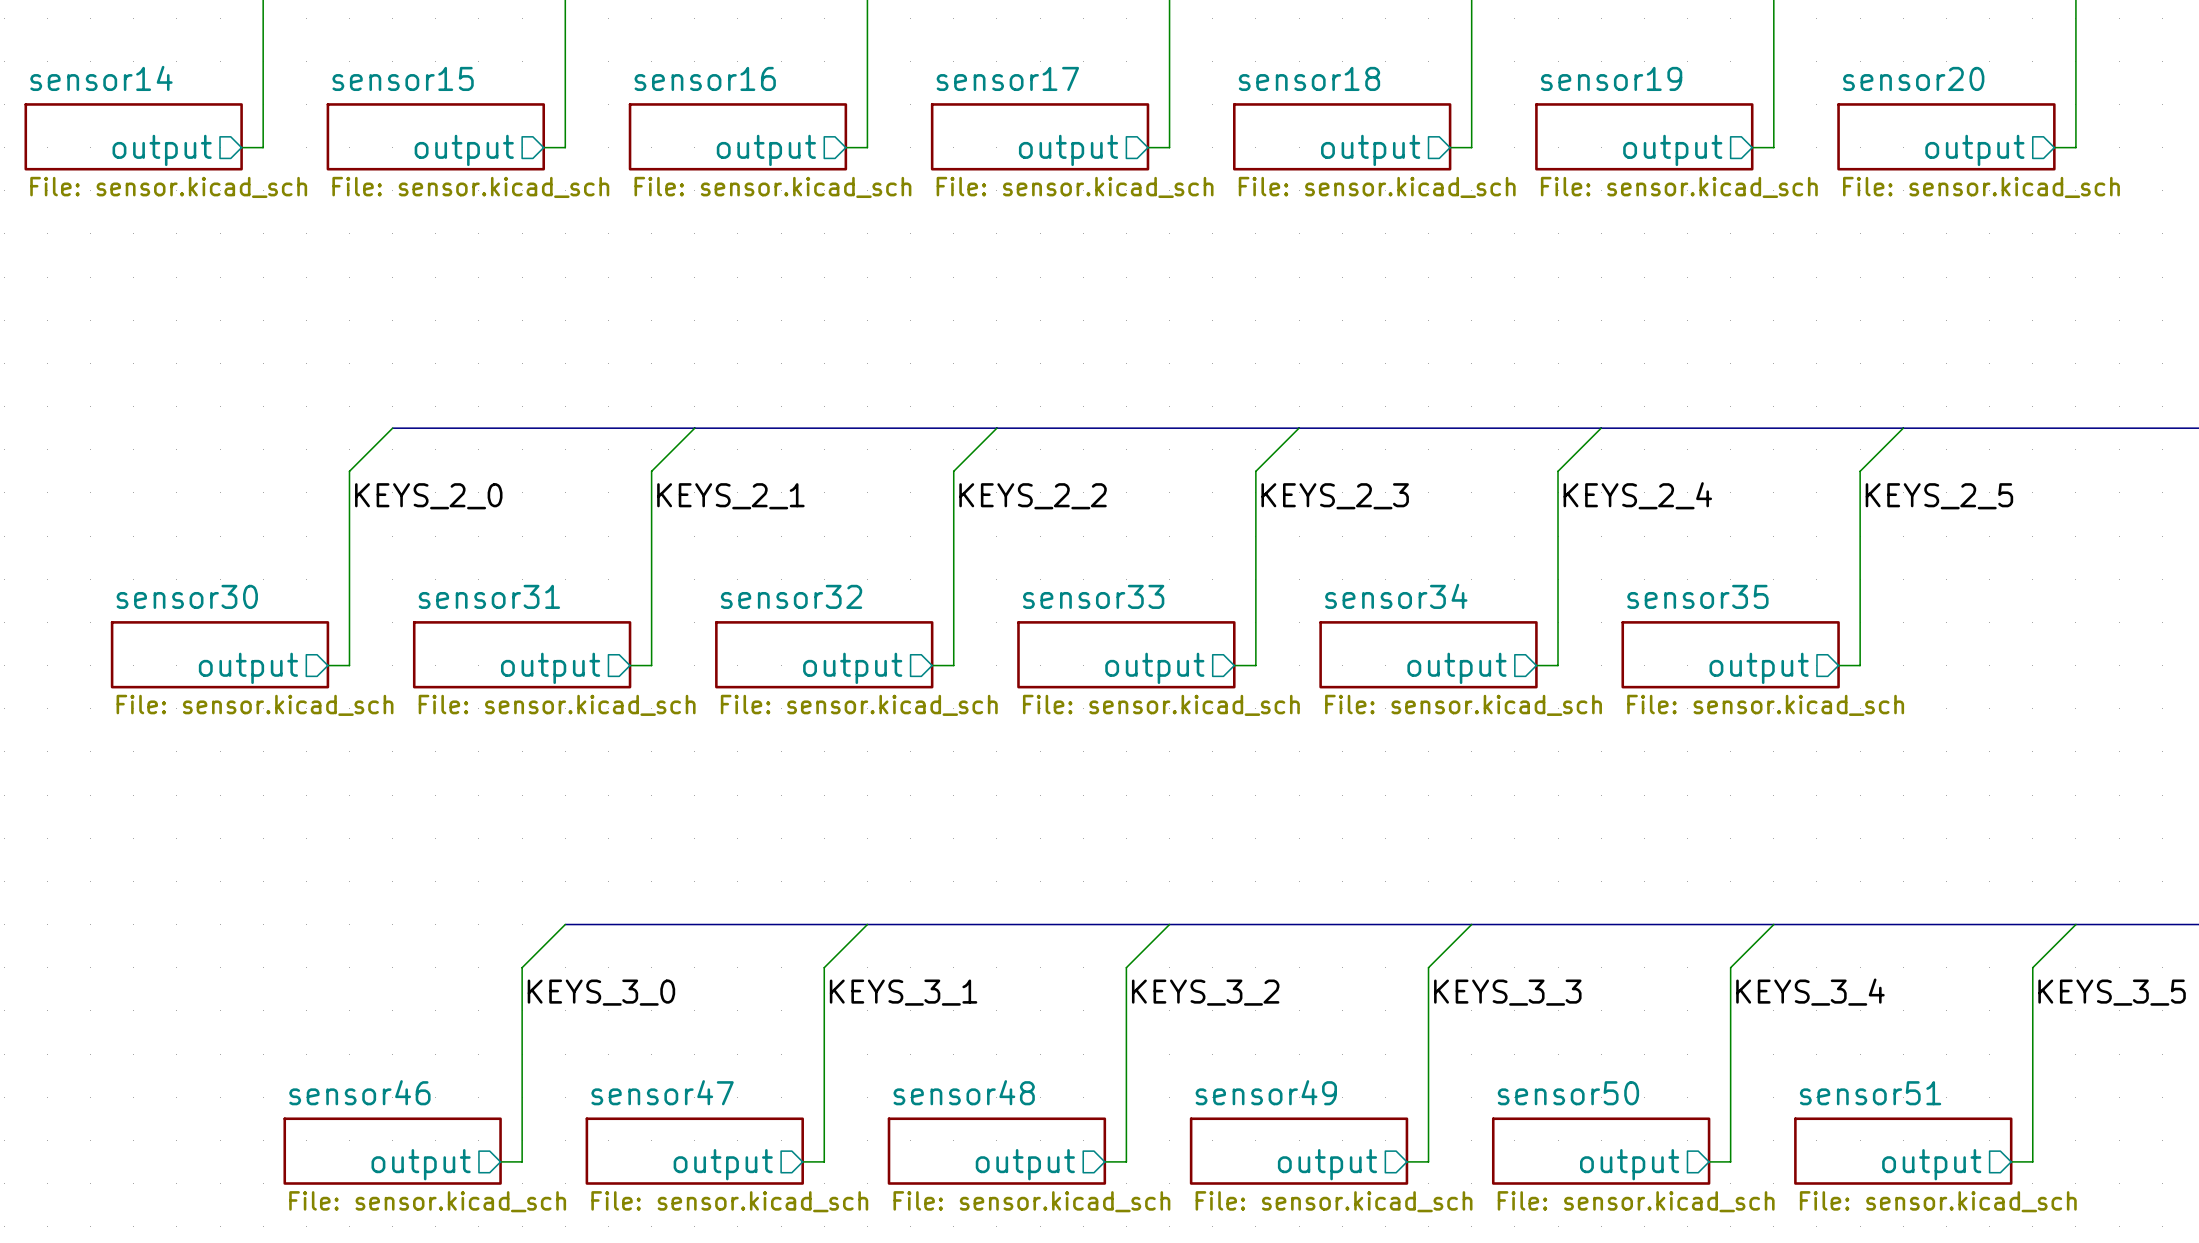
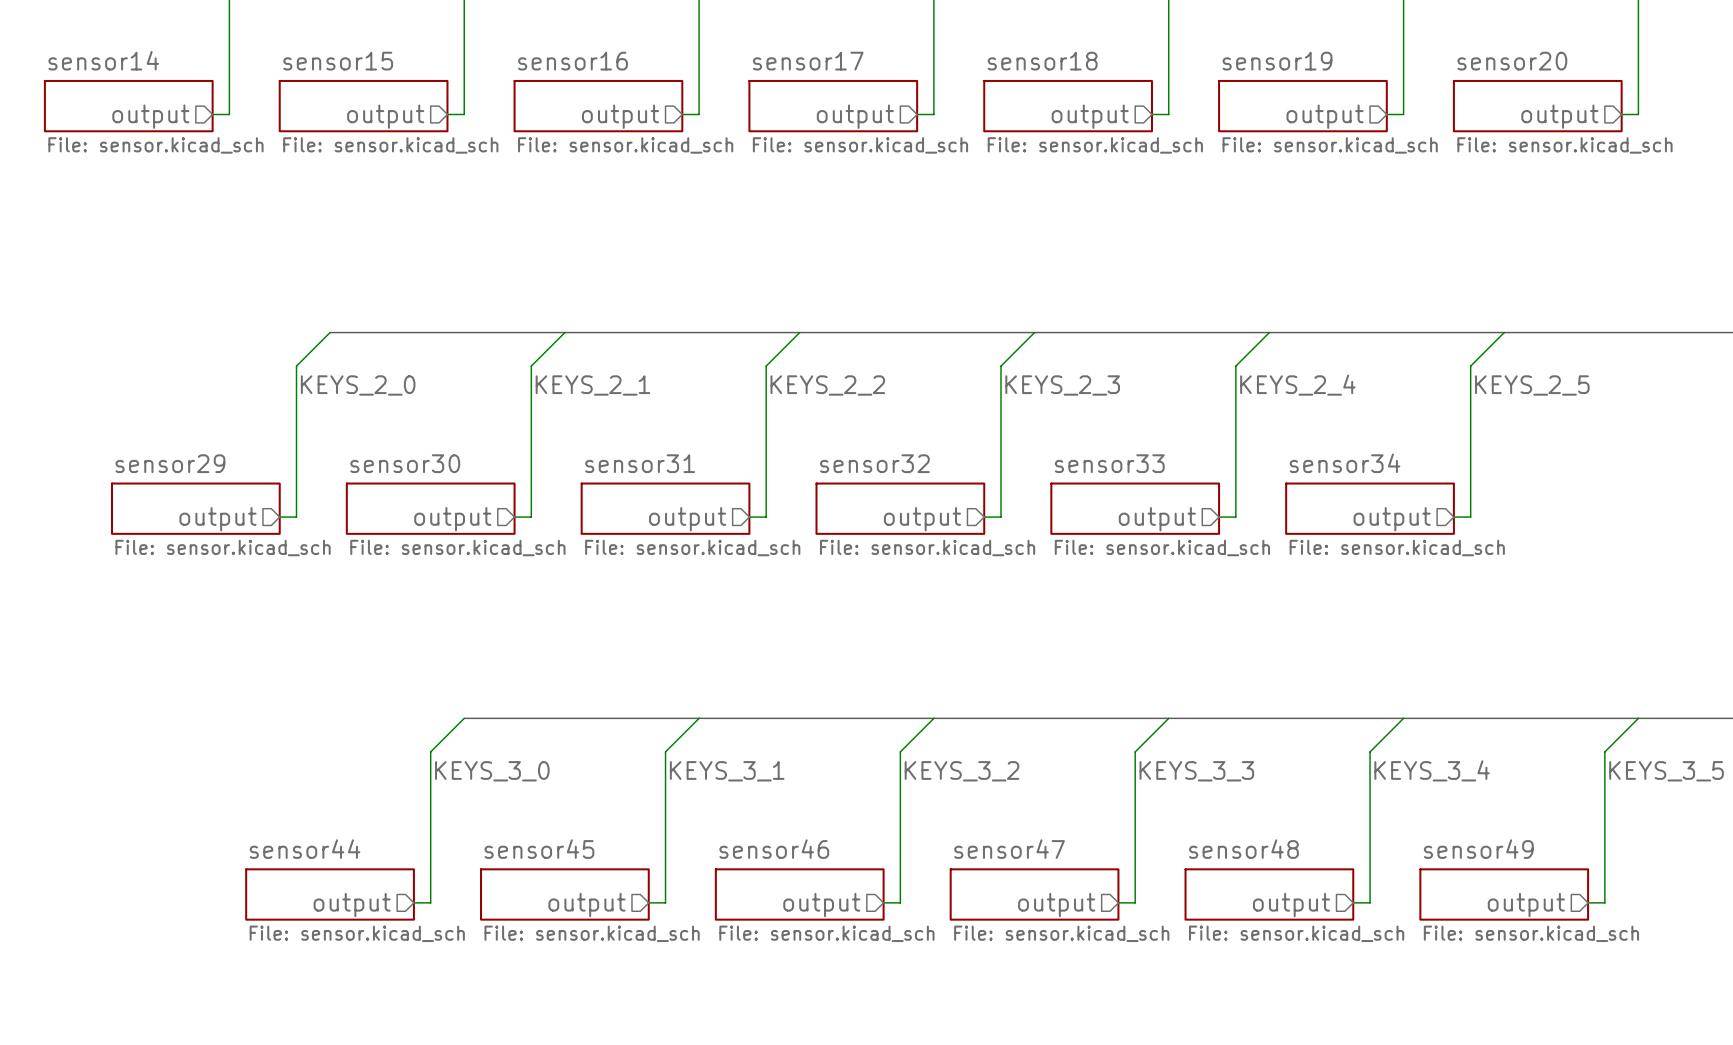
sheet sensor30 name: sensor30 (187, 596) -> sensor29 (170, 463)
sheet sensor31 name: sensor31 (489, 596) -> sensor30 (405, 463)
sheet sensor32 name: sensor32 (791, 596) -> sensor31 (640, 463)
sheet sensor33 name: sensor33 (1093, 596) -> sensor32 (874, 463)
sheet sensor34 name: sensor34 (1396, 596) -> sensor33 (1109, 463)
sheet sensor35 name: sensor35 (1697, 596) -> sensor34 (1345, 463)
sheet sensor46 name: sensor46 (359, 1092) -> sensor44 (305, 849)
sheet sensor47 name: sensor47 (662, 1092) -> sensor45 (539, 849)
sheet sensor48 name: sensor48 (964, 1092) -> sensor46 (774, 849)
sheet sensor49 name: sensor49 (1266, 1092) -> sensor47 (1009, 849)
sheet sensor50 name: sensor50 (1568, 1093) -> sensor48 (1243, 849)
sheet sensor51 name: sensor51 (1870, 1093) -> sensor49 (1478, 849)

